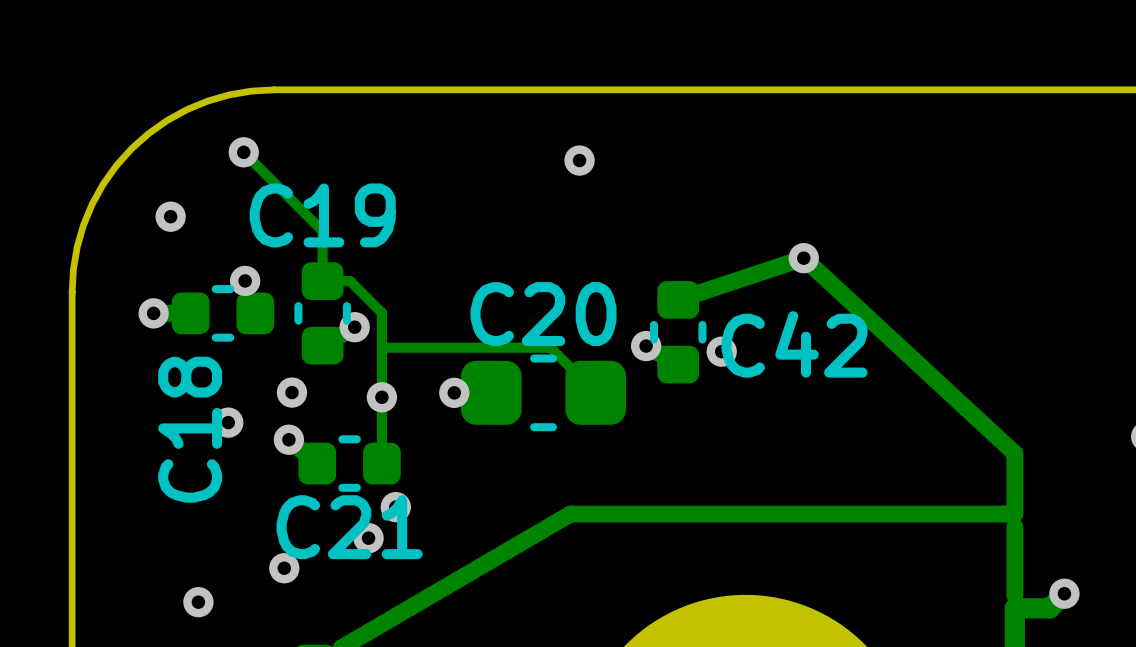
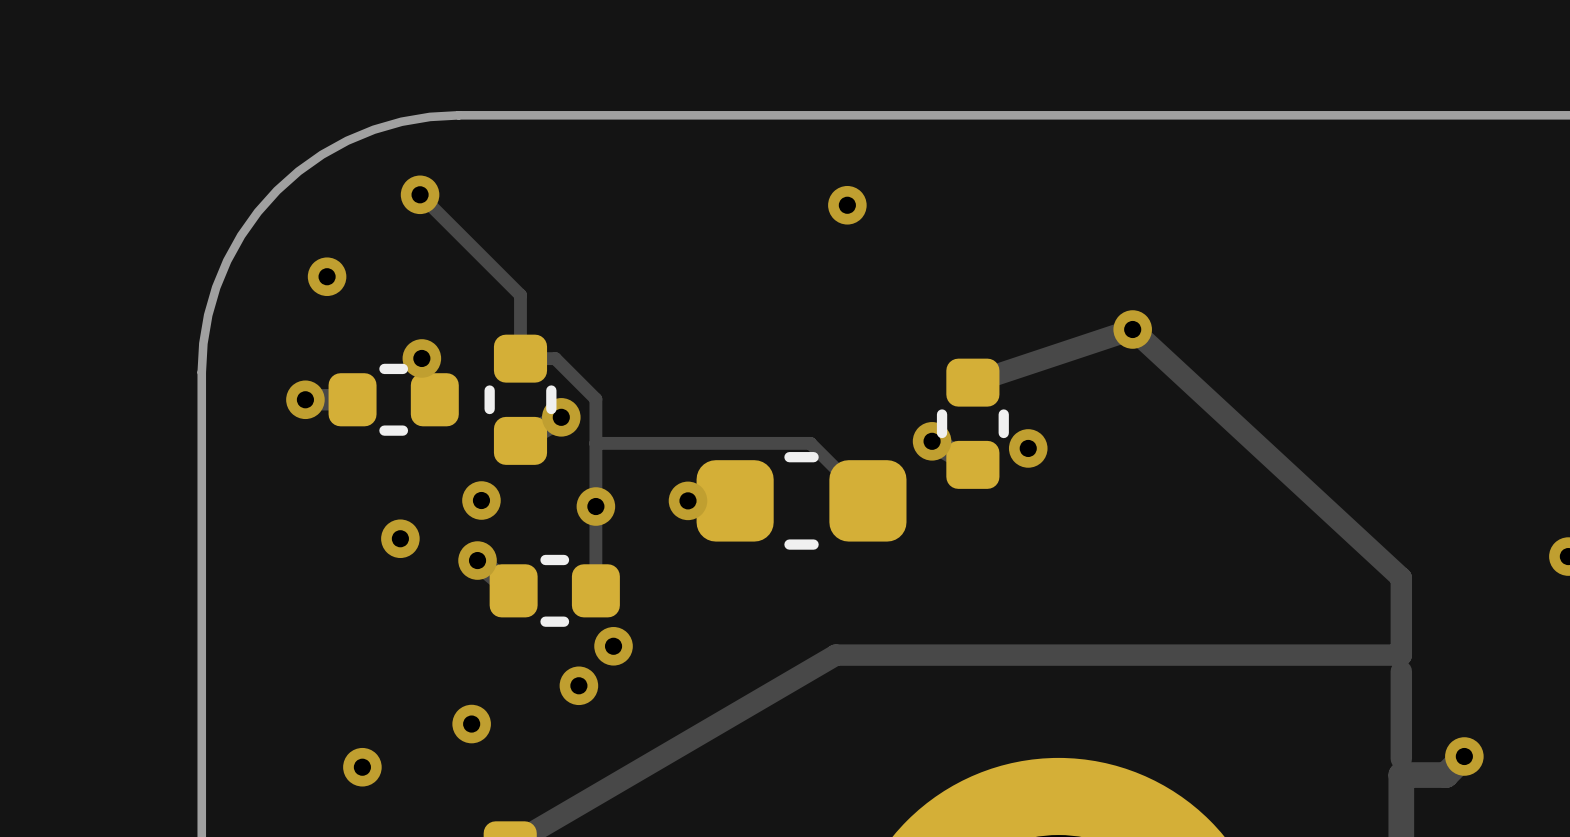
C19 name: C19 (322, 215) -> none
C20 name: C20 (543, 314) -> none
C42 name: C42 (794, 344) -> none
C18 name: C18 (190, 429) -> none
C21 name: C21 (349, 527) -> none

